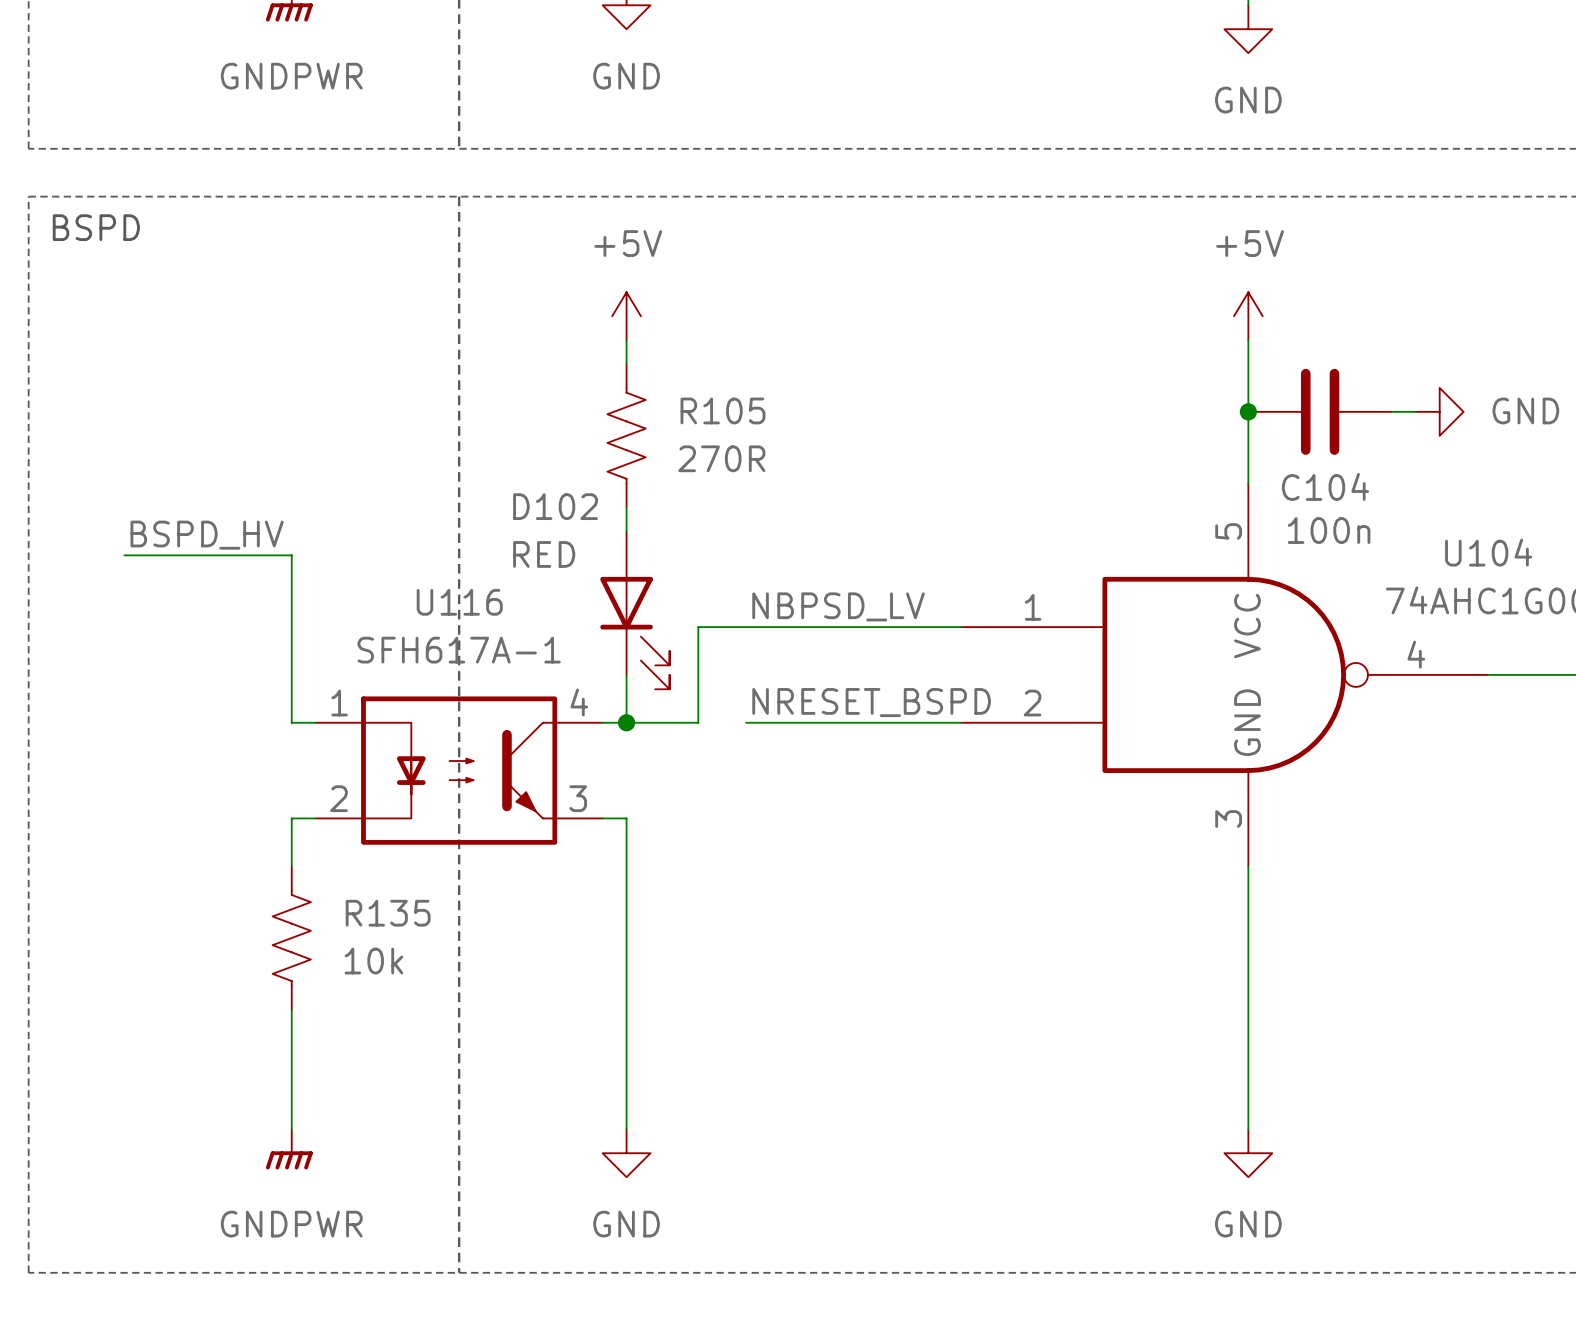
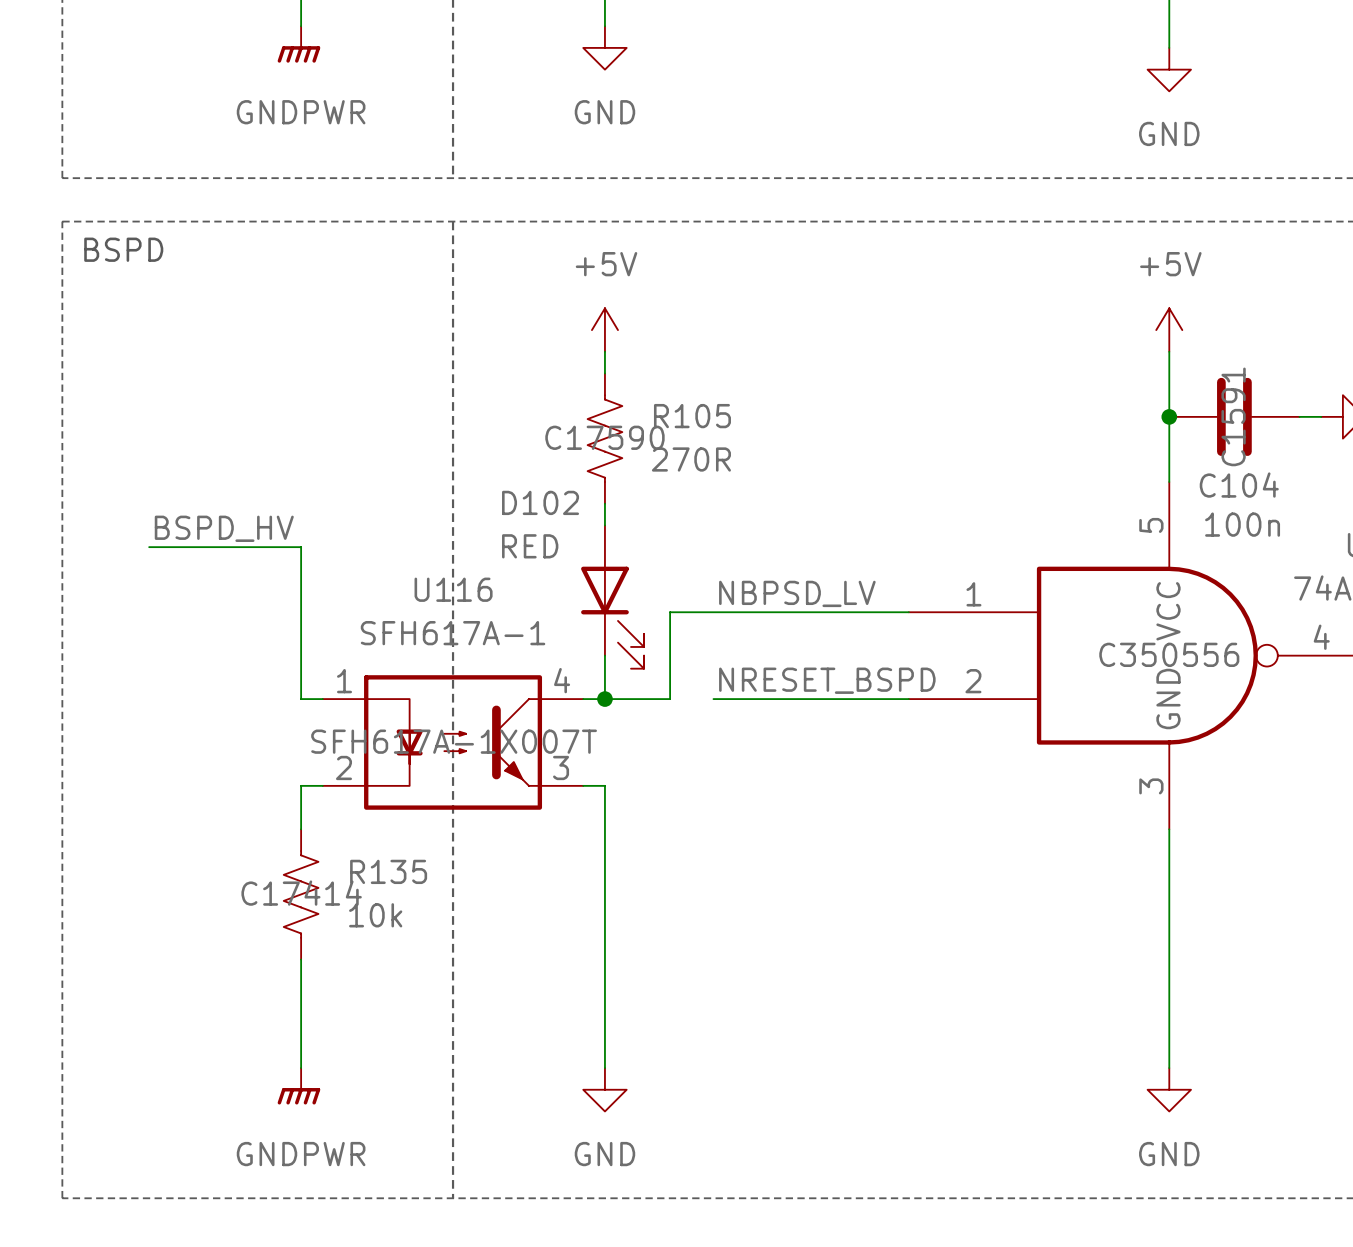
C104 text: none -> C1591 (1233, 416)
R105 text: none -> C17590 (604, 437)
U104 text: none -> C350556 (1169, 654)
U116 text: none -> SFH617A-1X007T (454, 741)
R135 text: none -> C17414 (301, 893)

